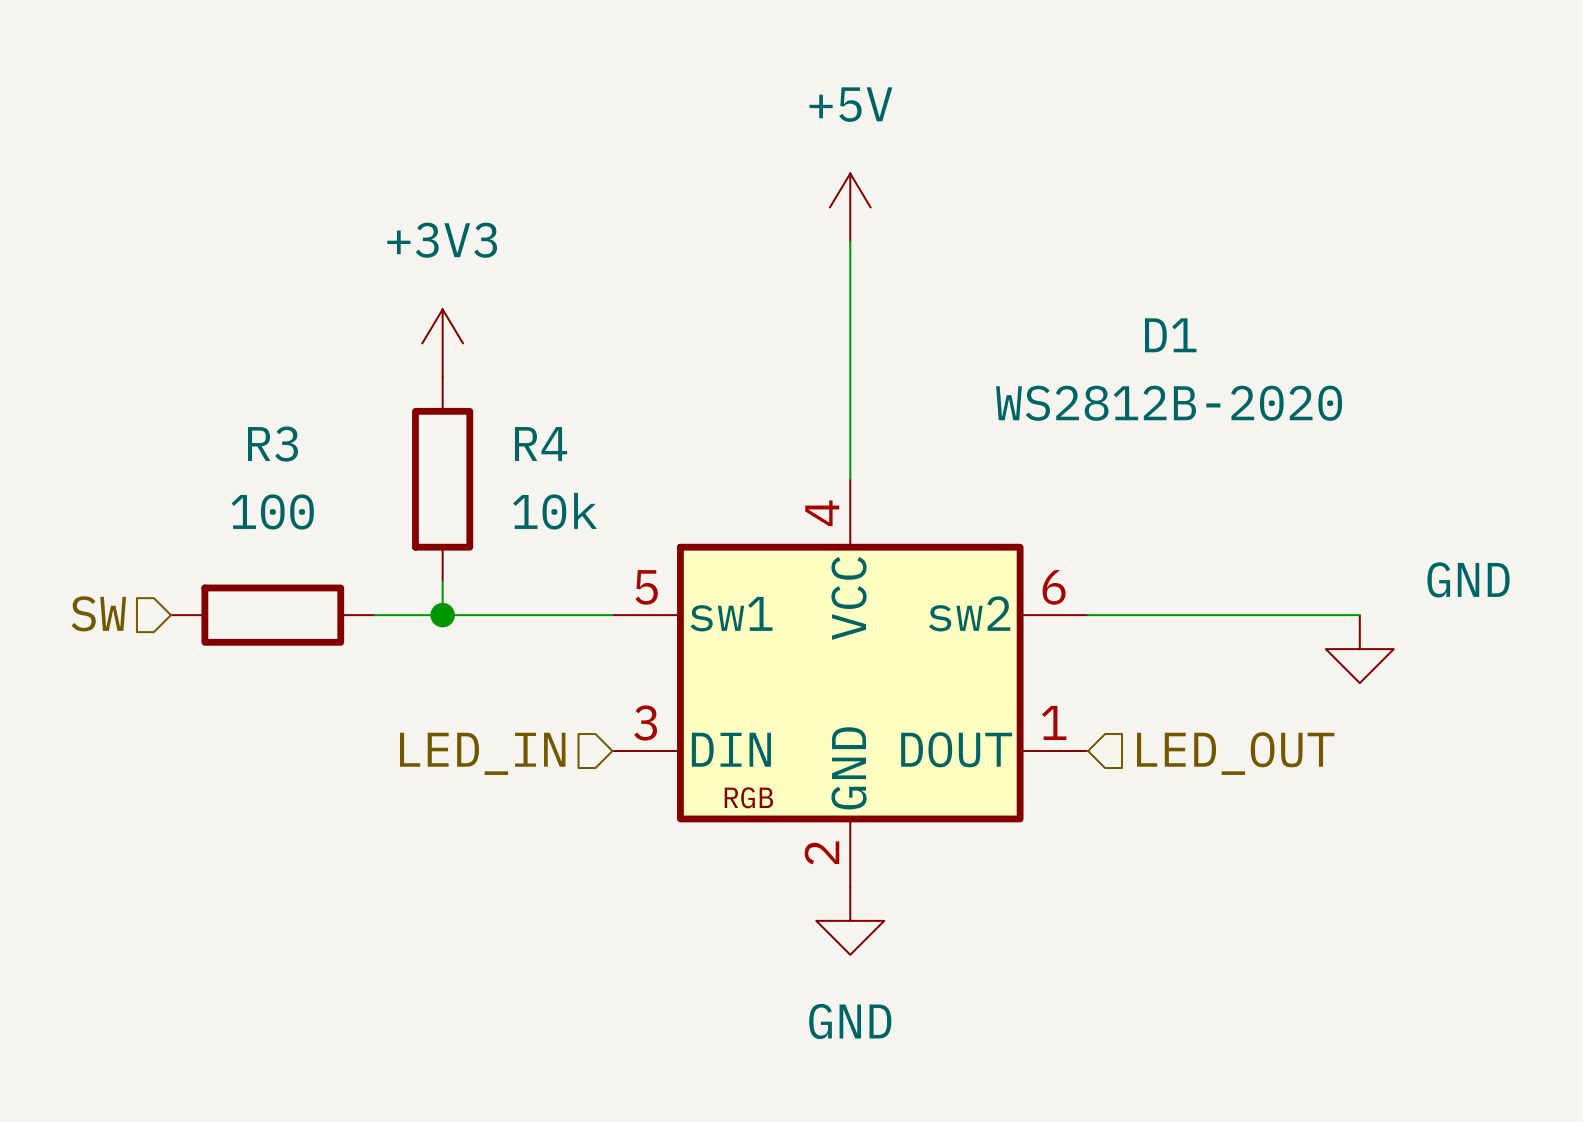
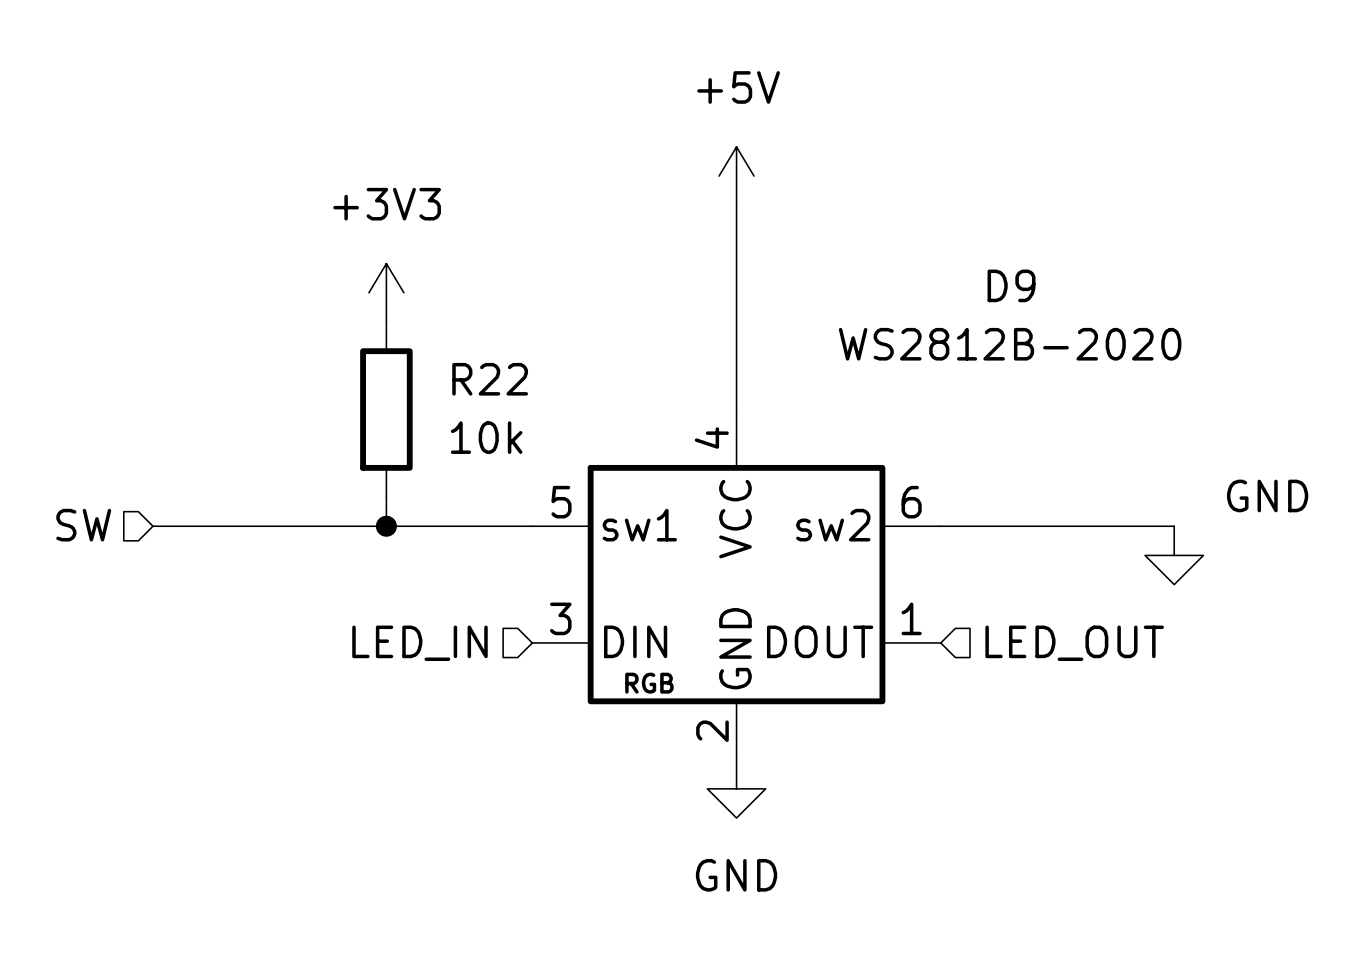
D1 name: D1 (1170, 335) -> D9 (1011, 285)
R4 name: R4 (541, 444) -> R22 (490, 379)
wire: none -> (152, 526) (328, 526)
R3: 100 (272, 615) -> none

